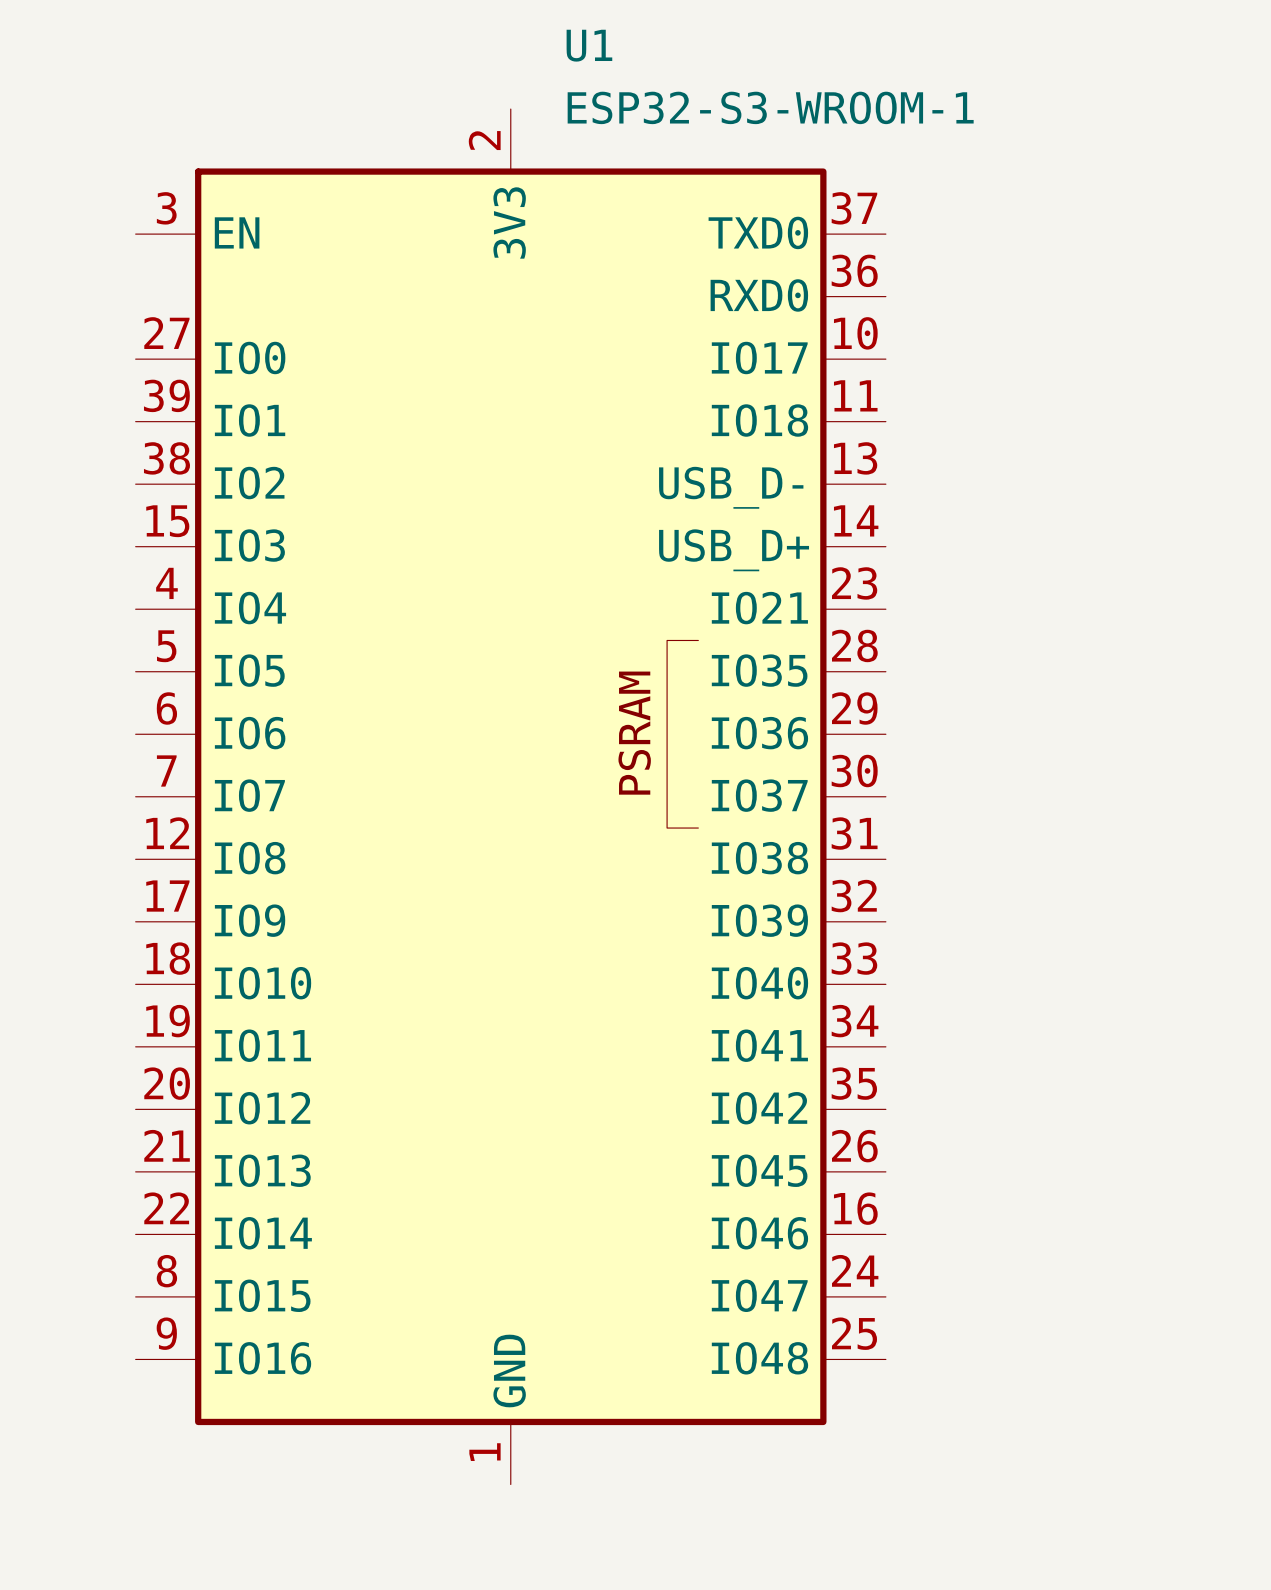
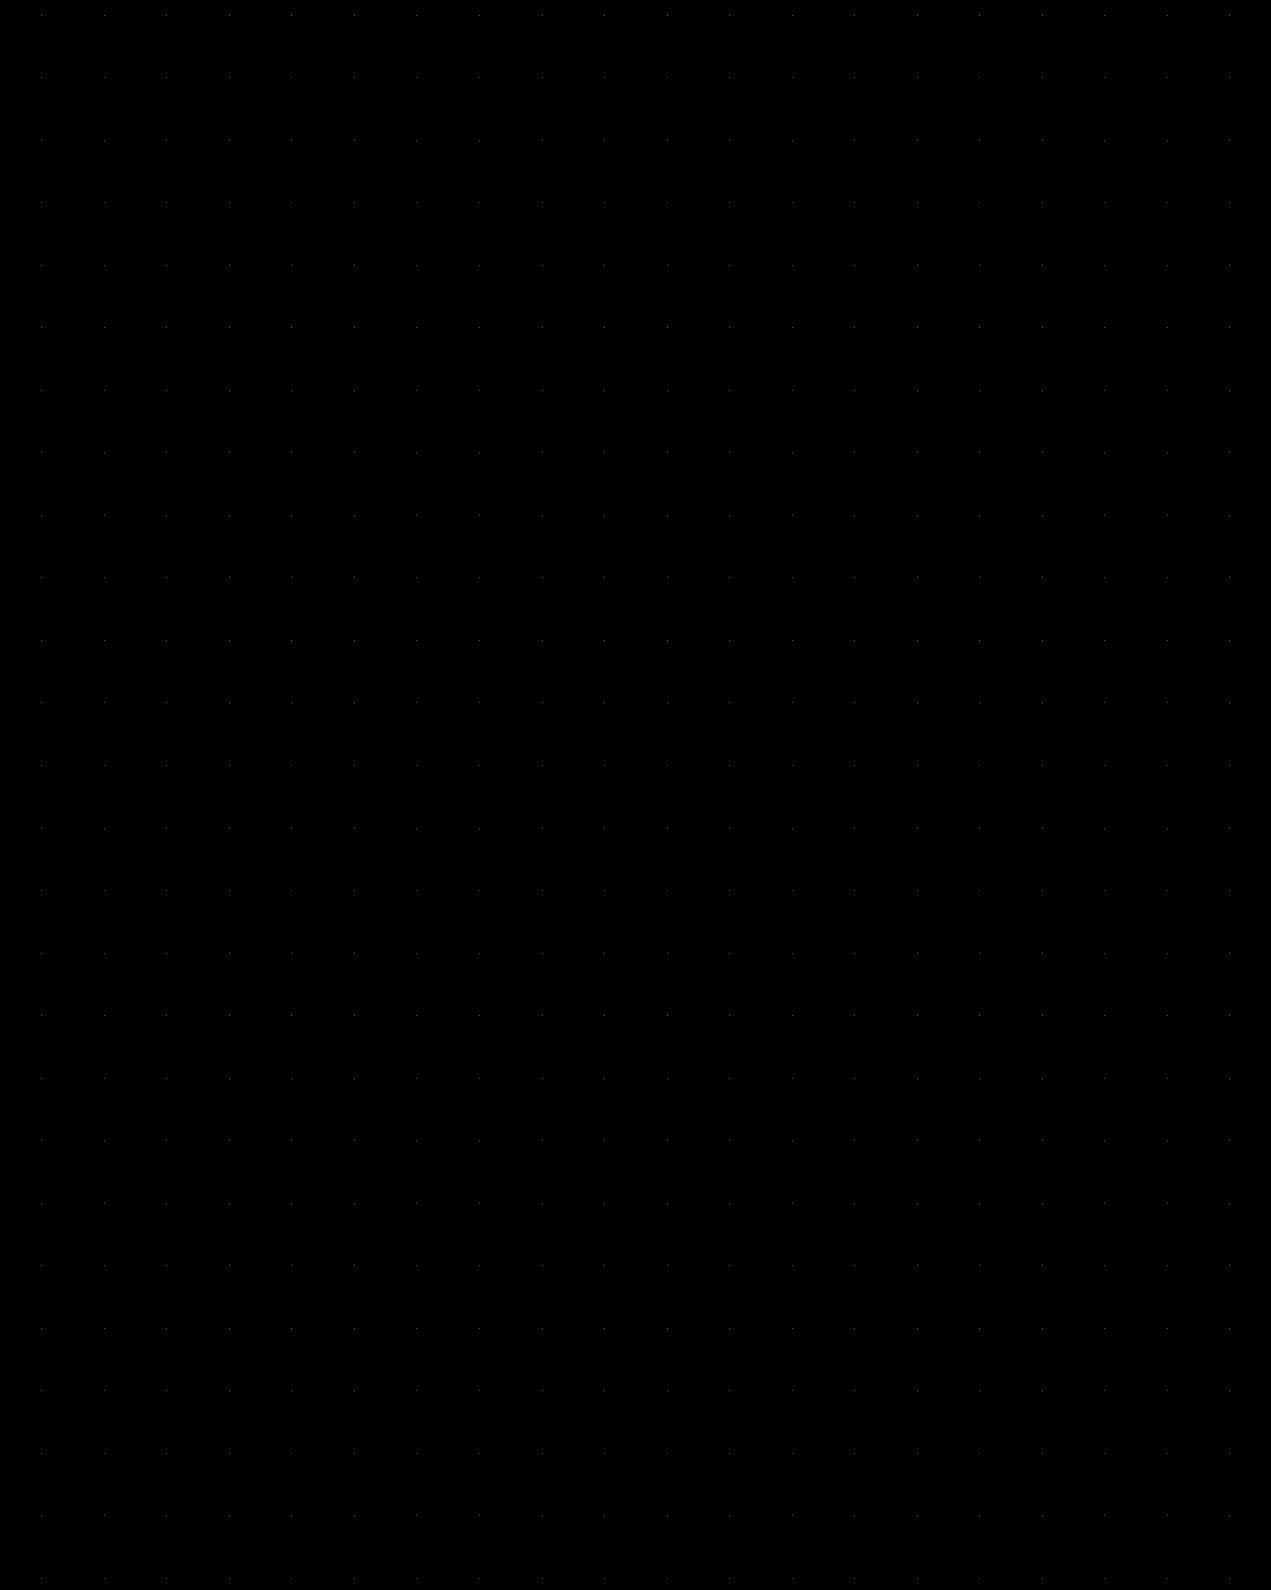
U1: ESP32-S3-WROOM-1 (510, 796) -> none

